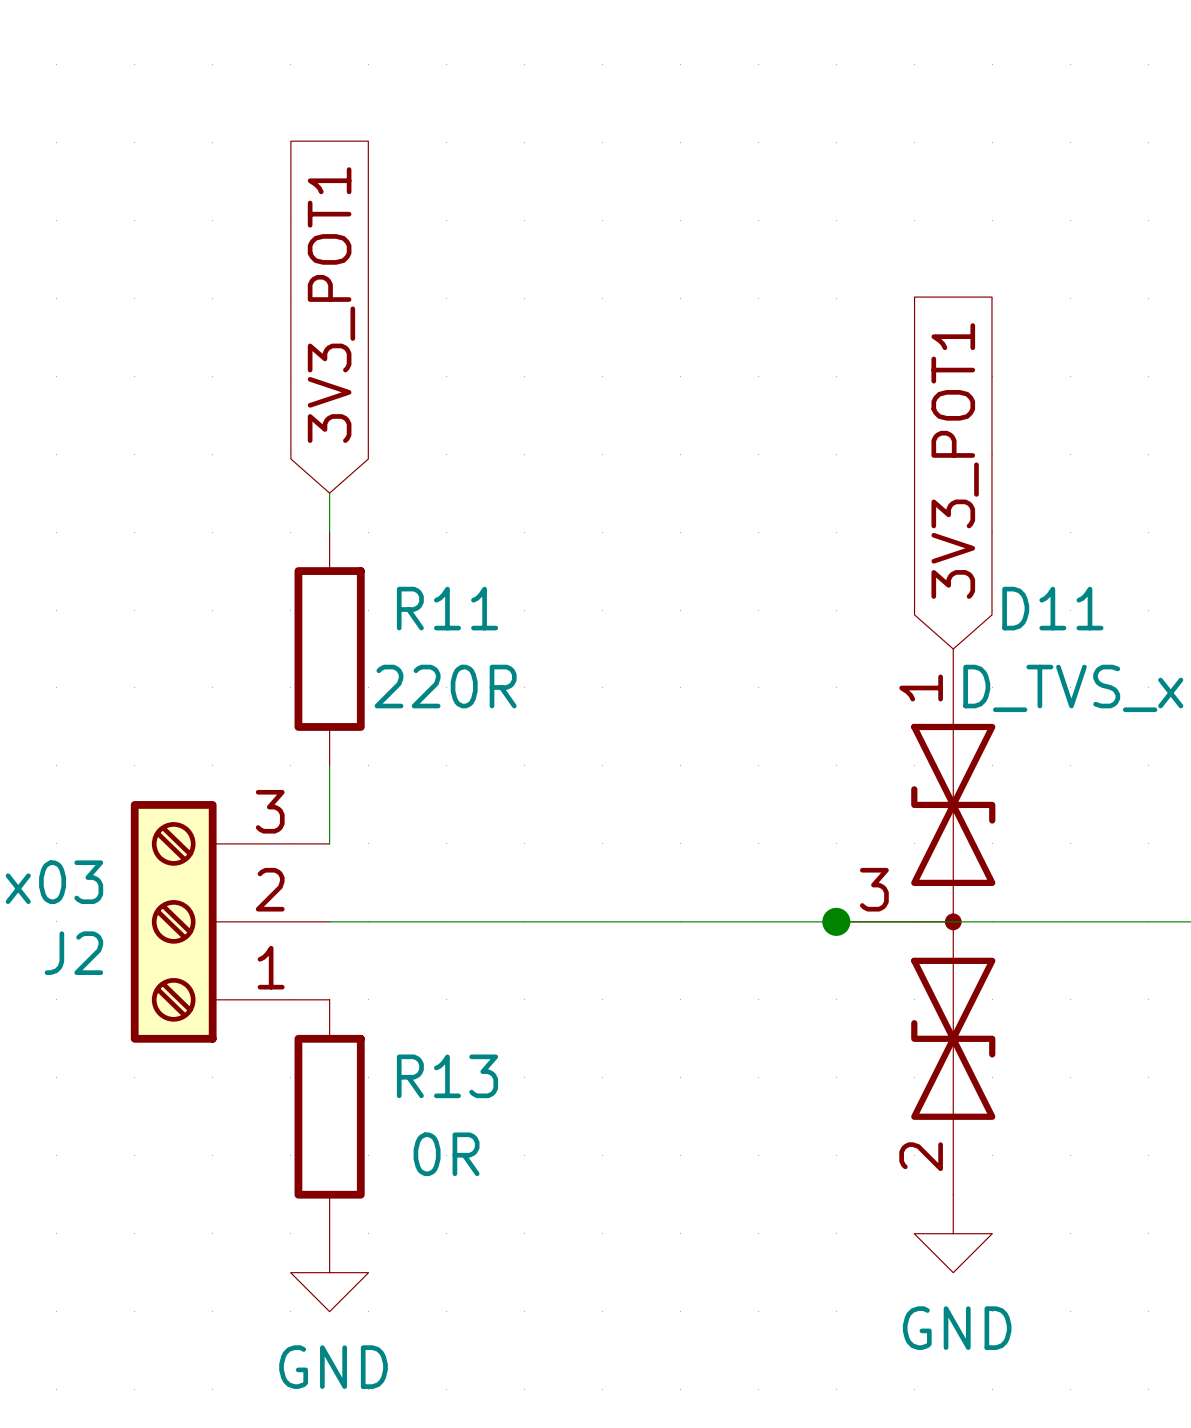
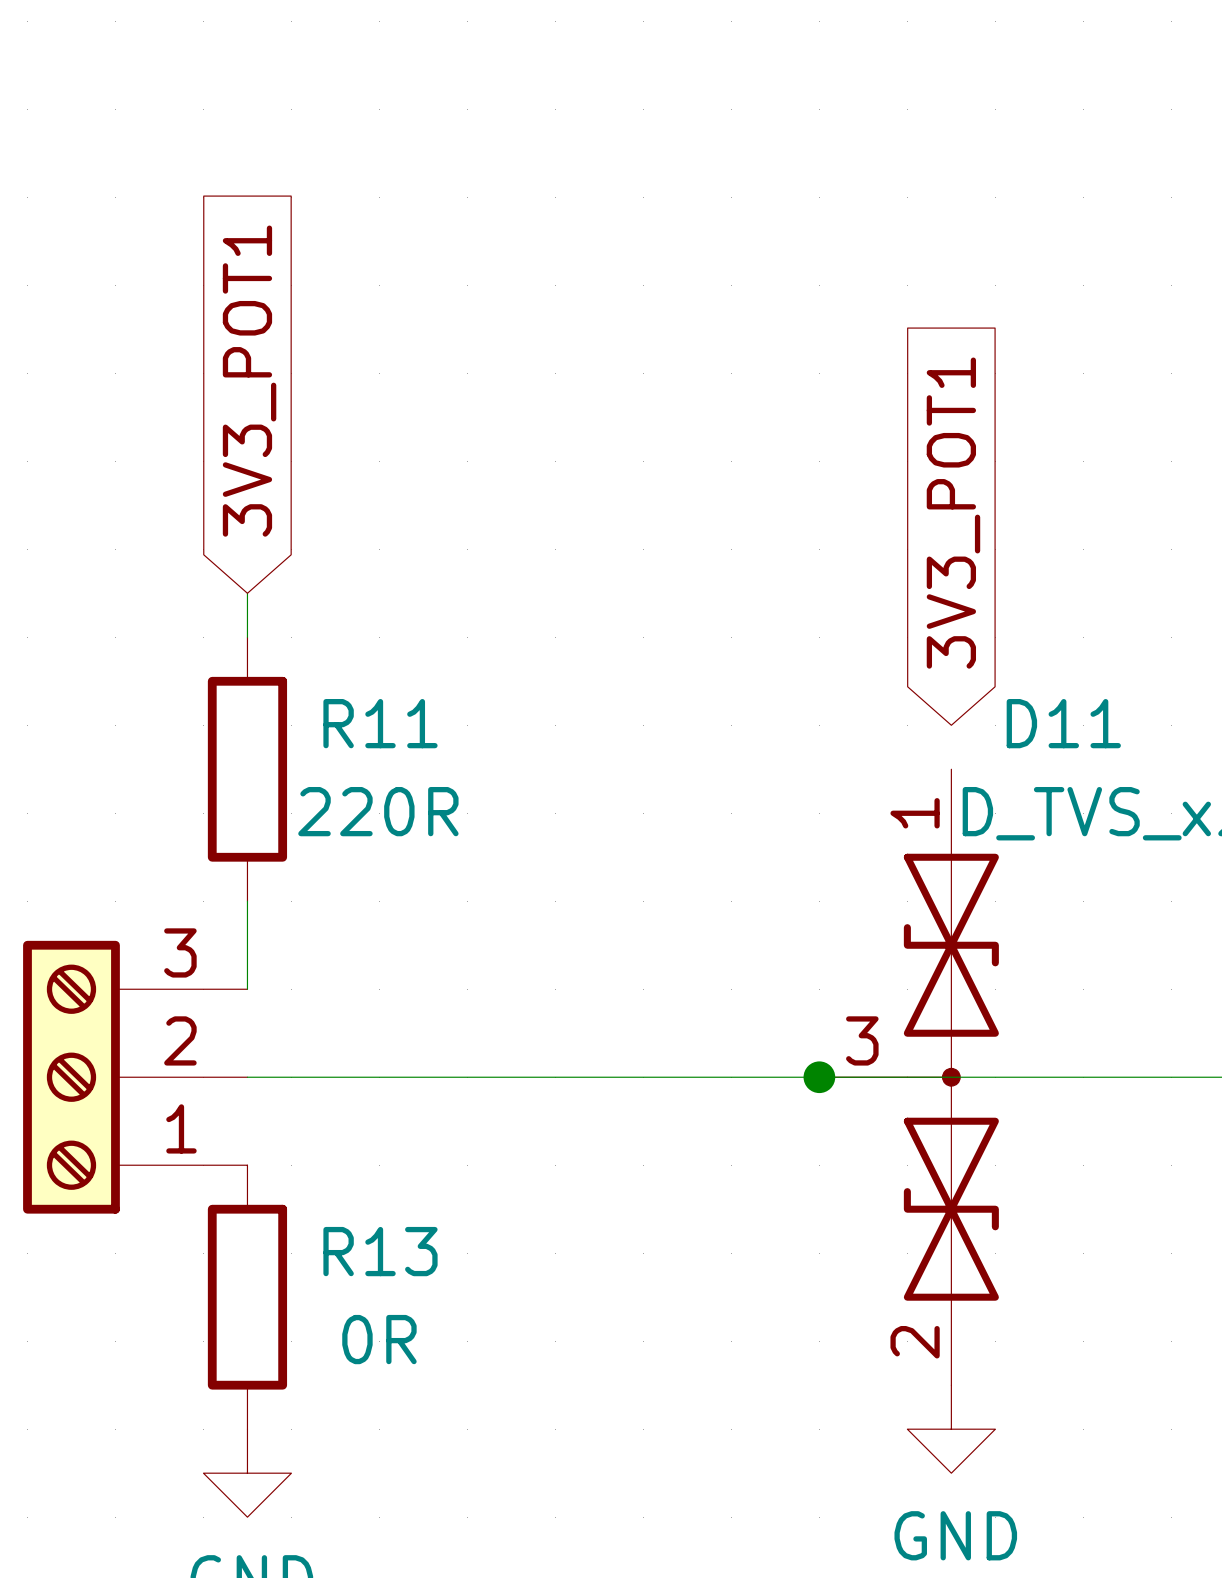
global label position: 3V3_POT1 (955, 461) -> 3V3_POT1 (953, 513)

